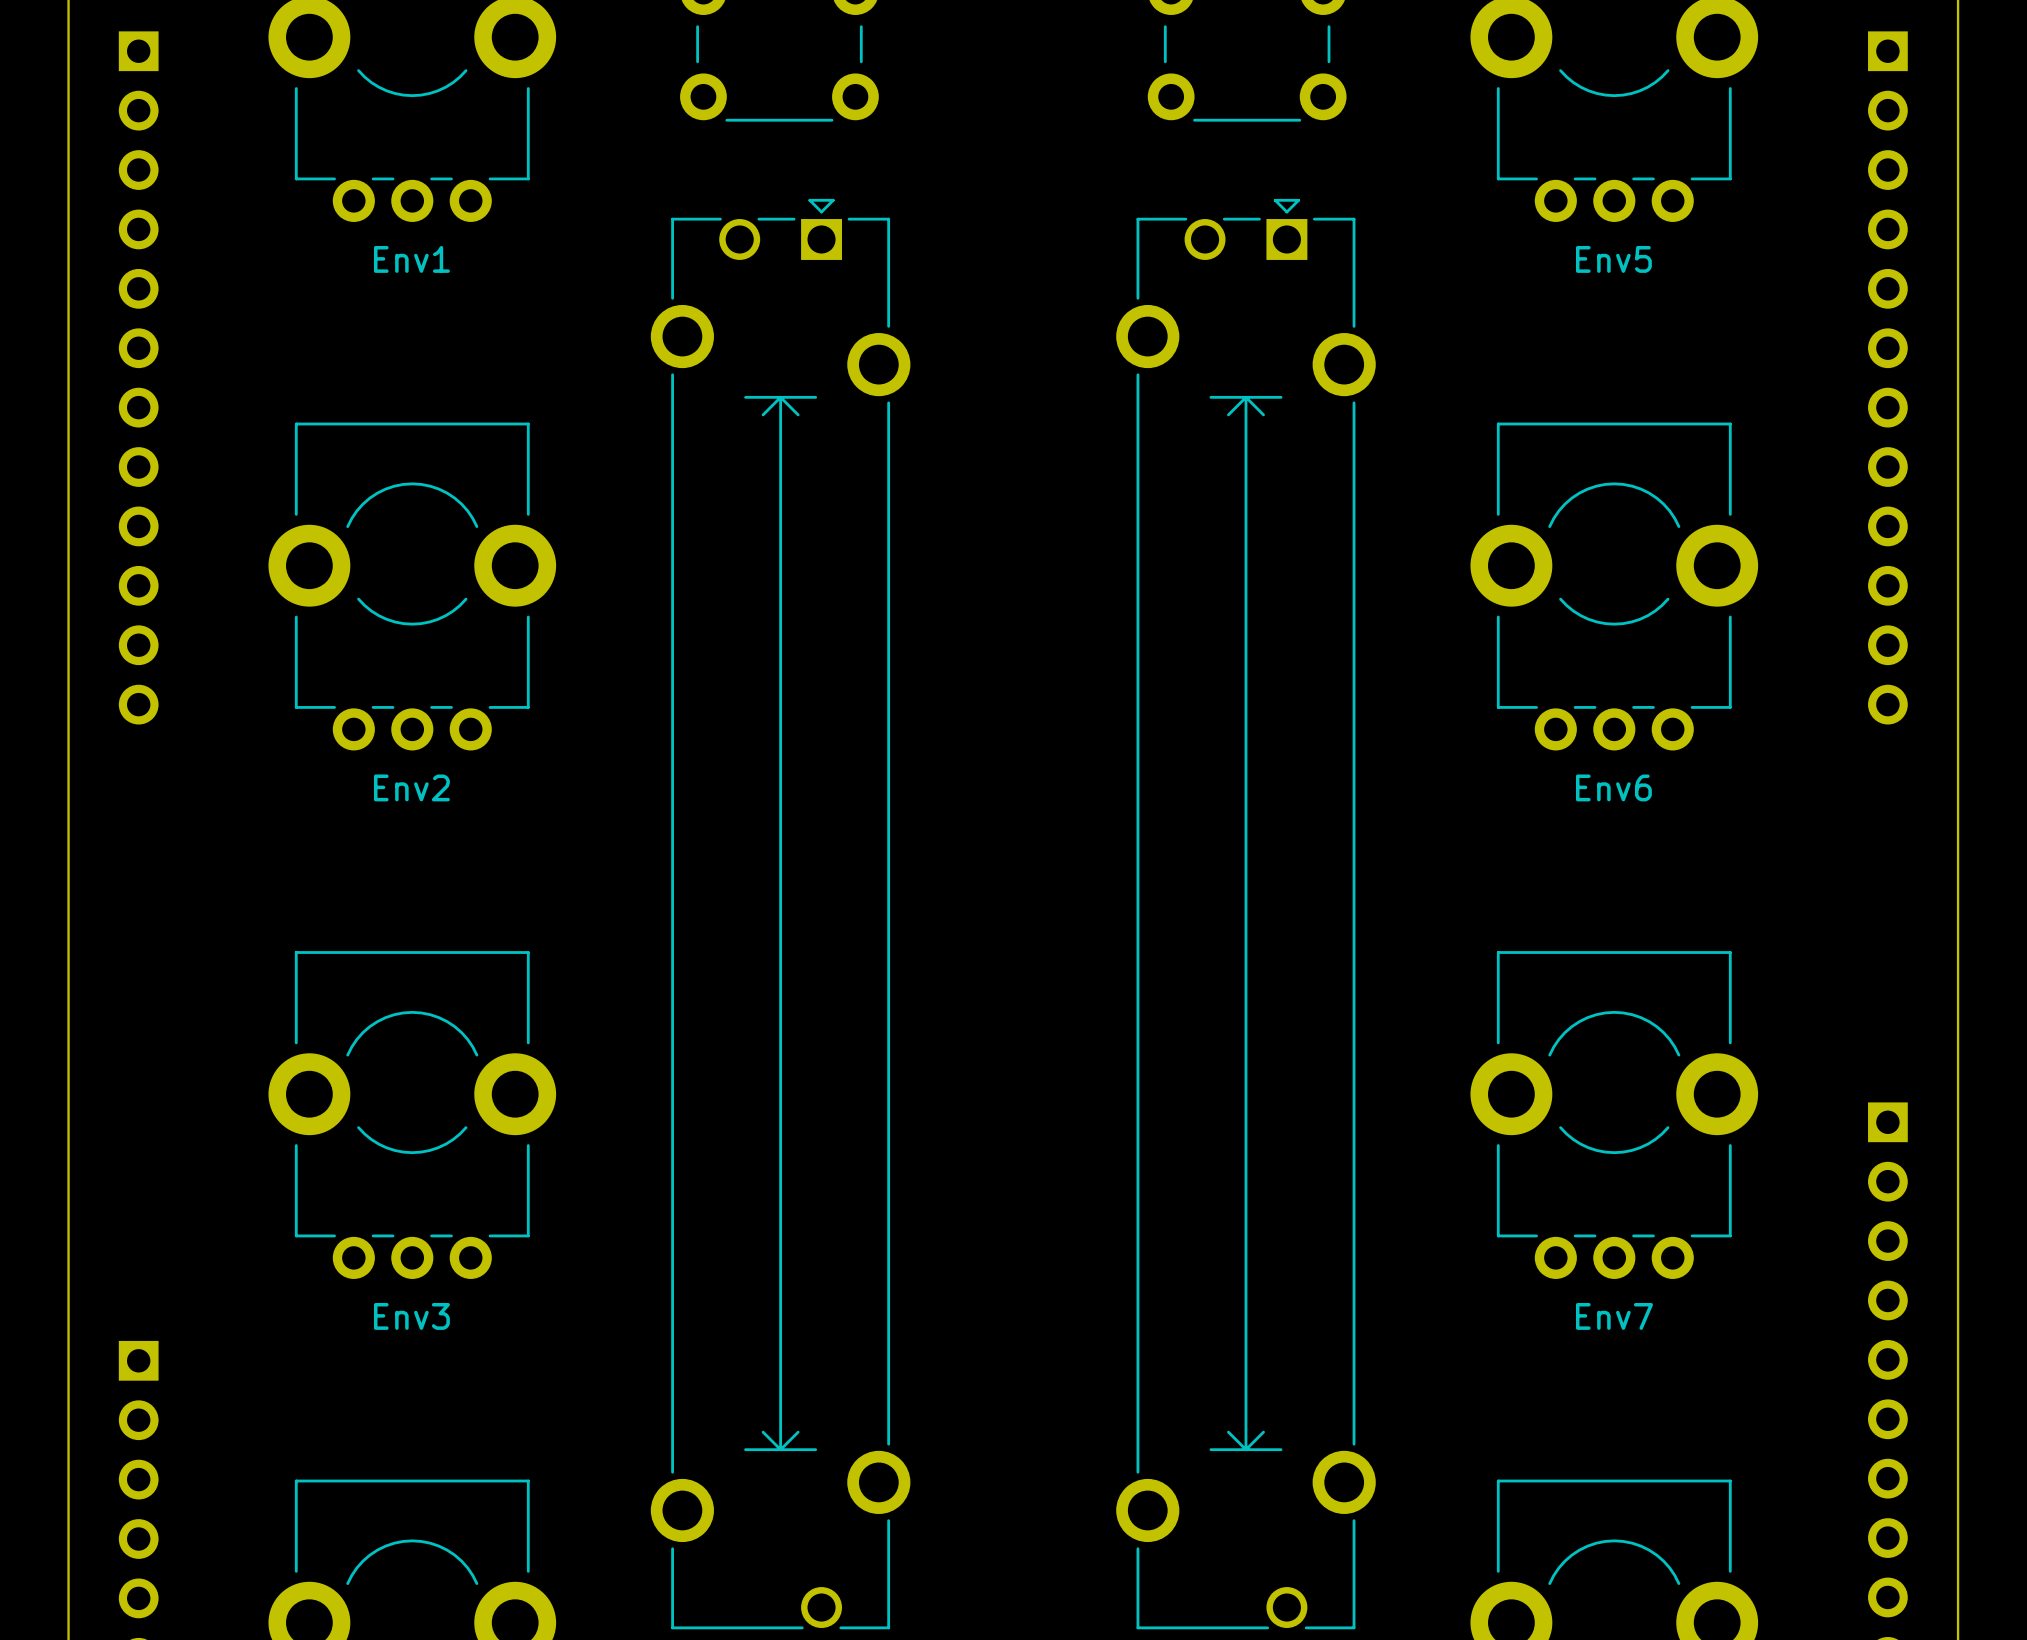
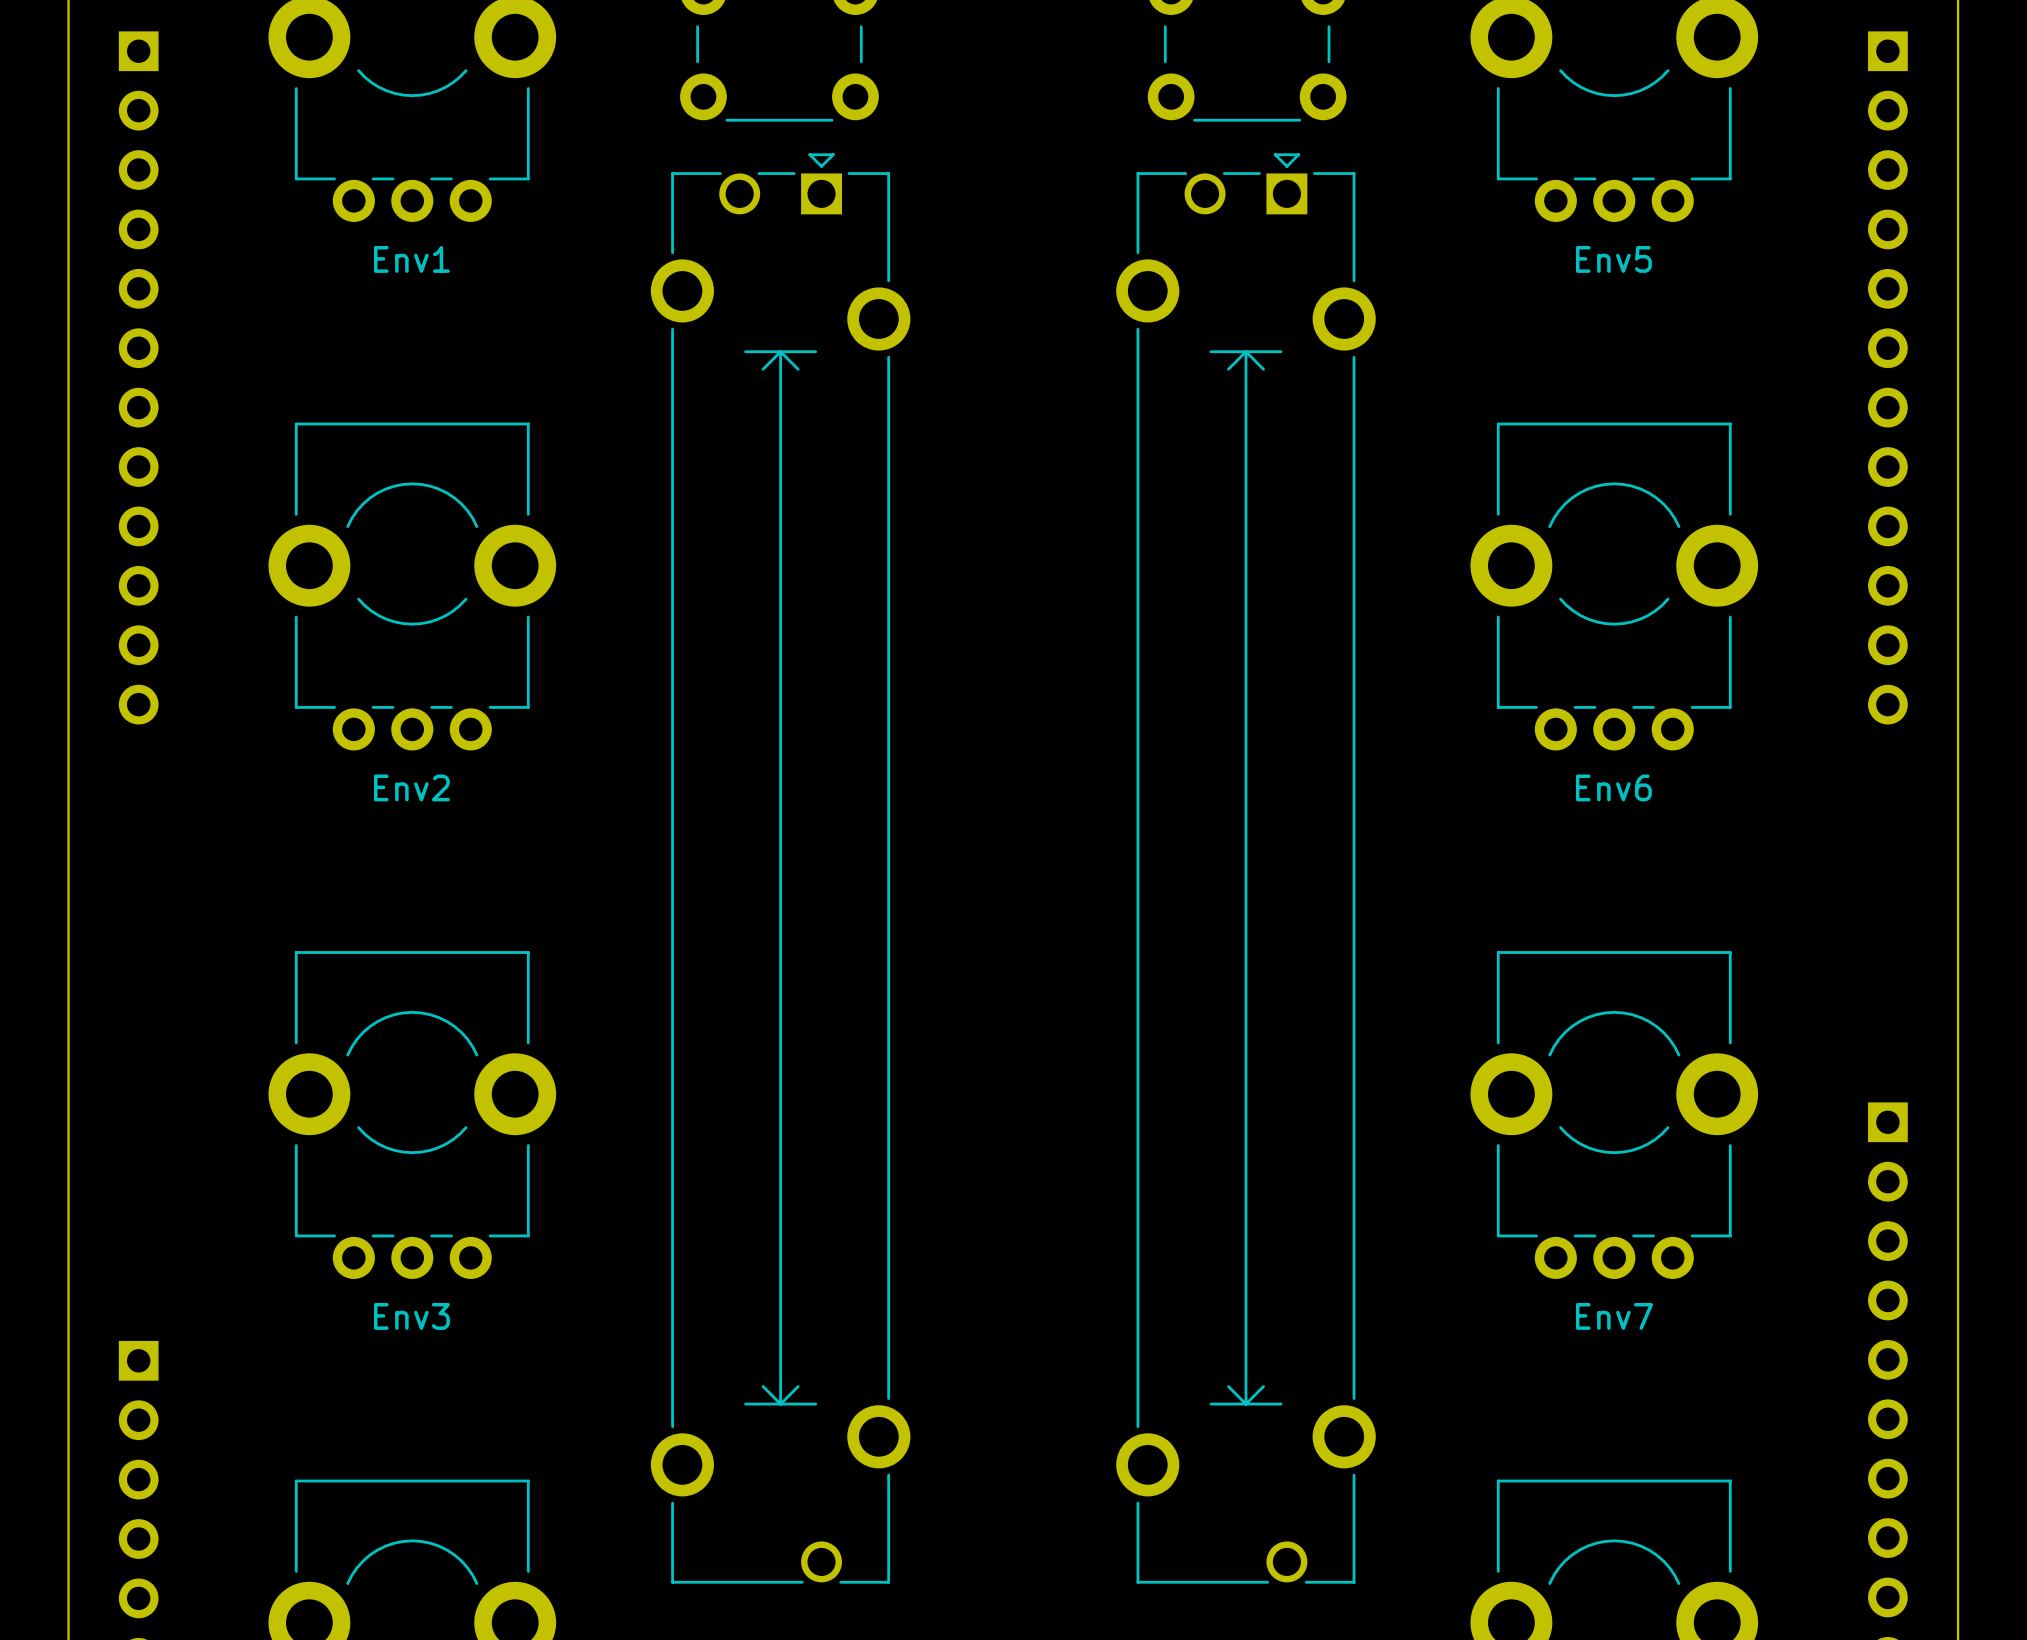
part position: (780, 914) -> (780, 868)
part position: (1245, 914) -> (1245, 868)

